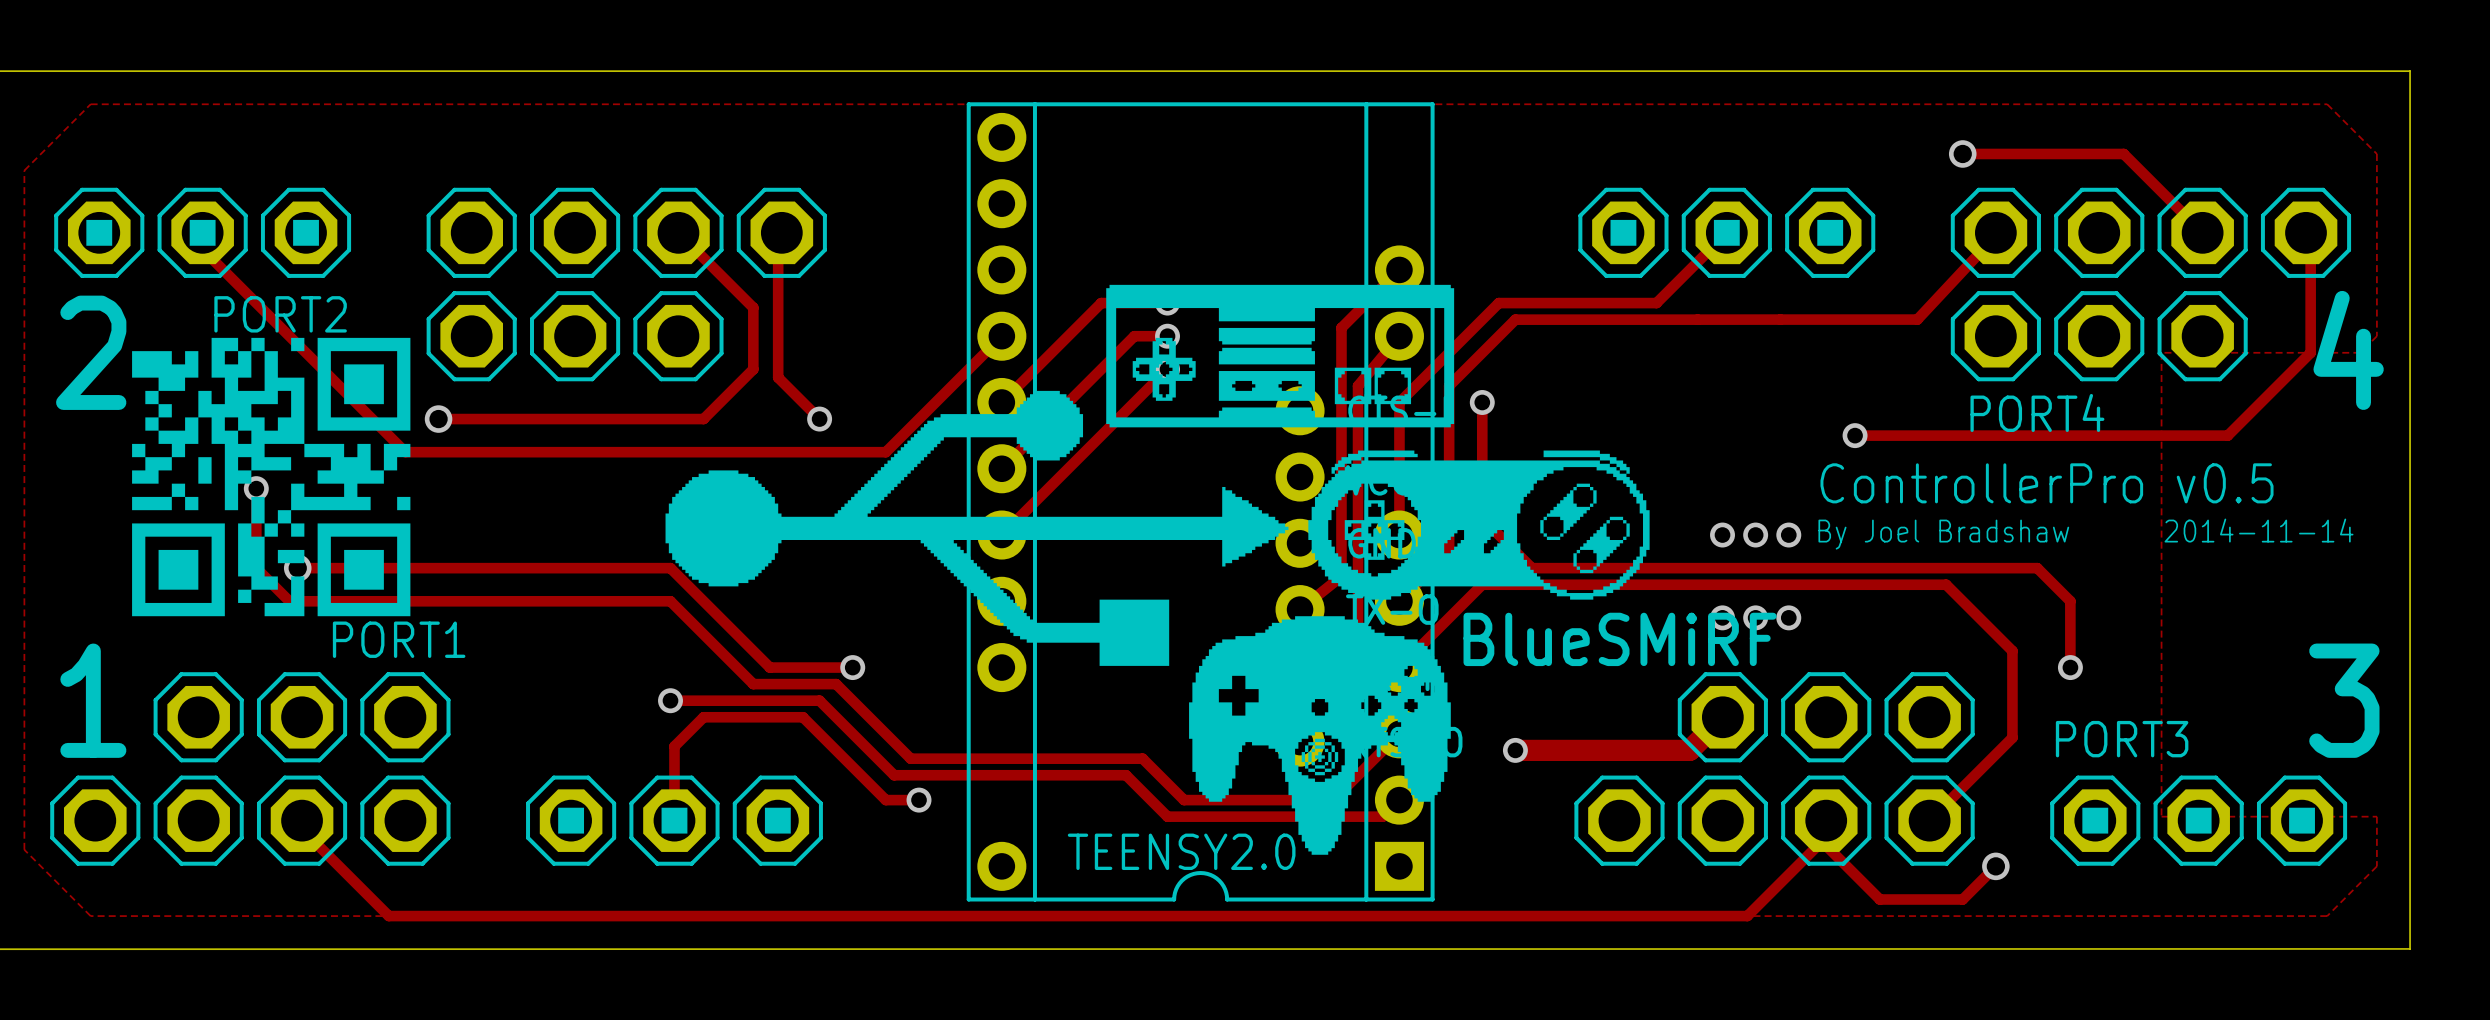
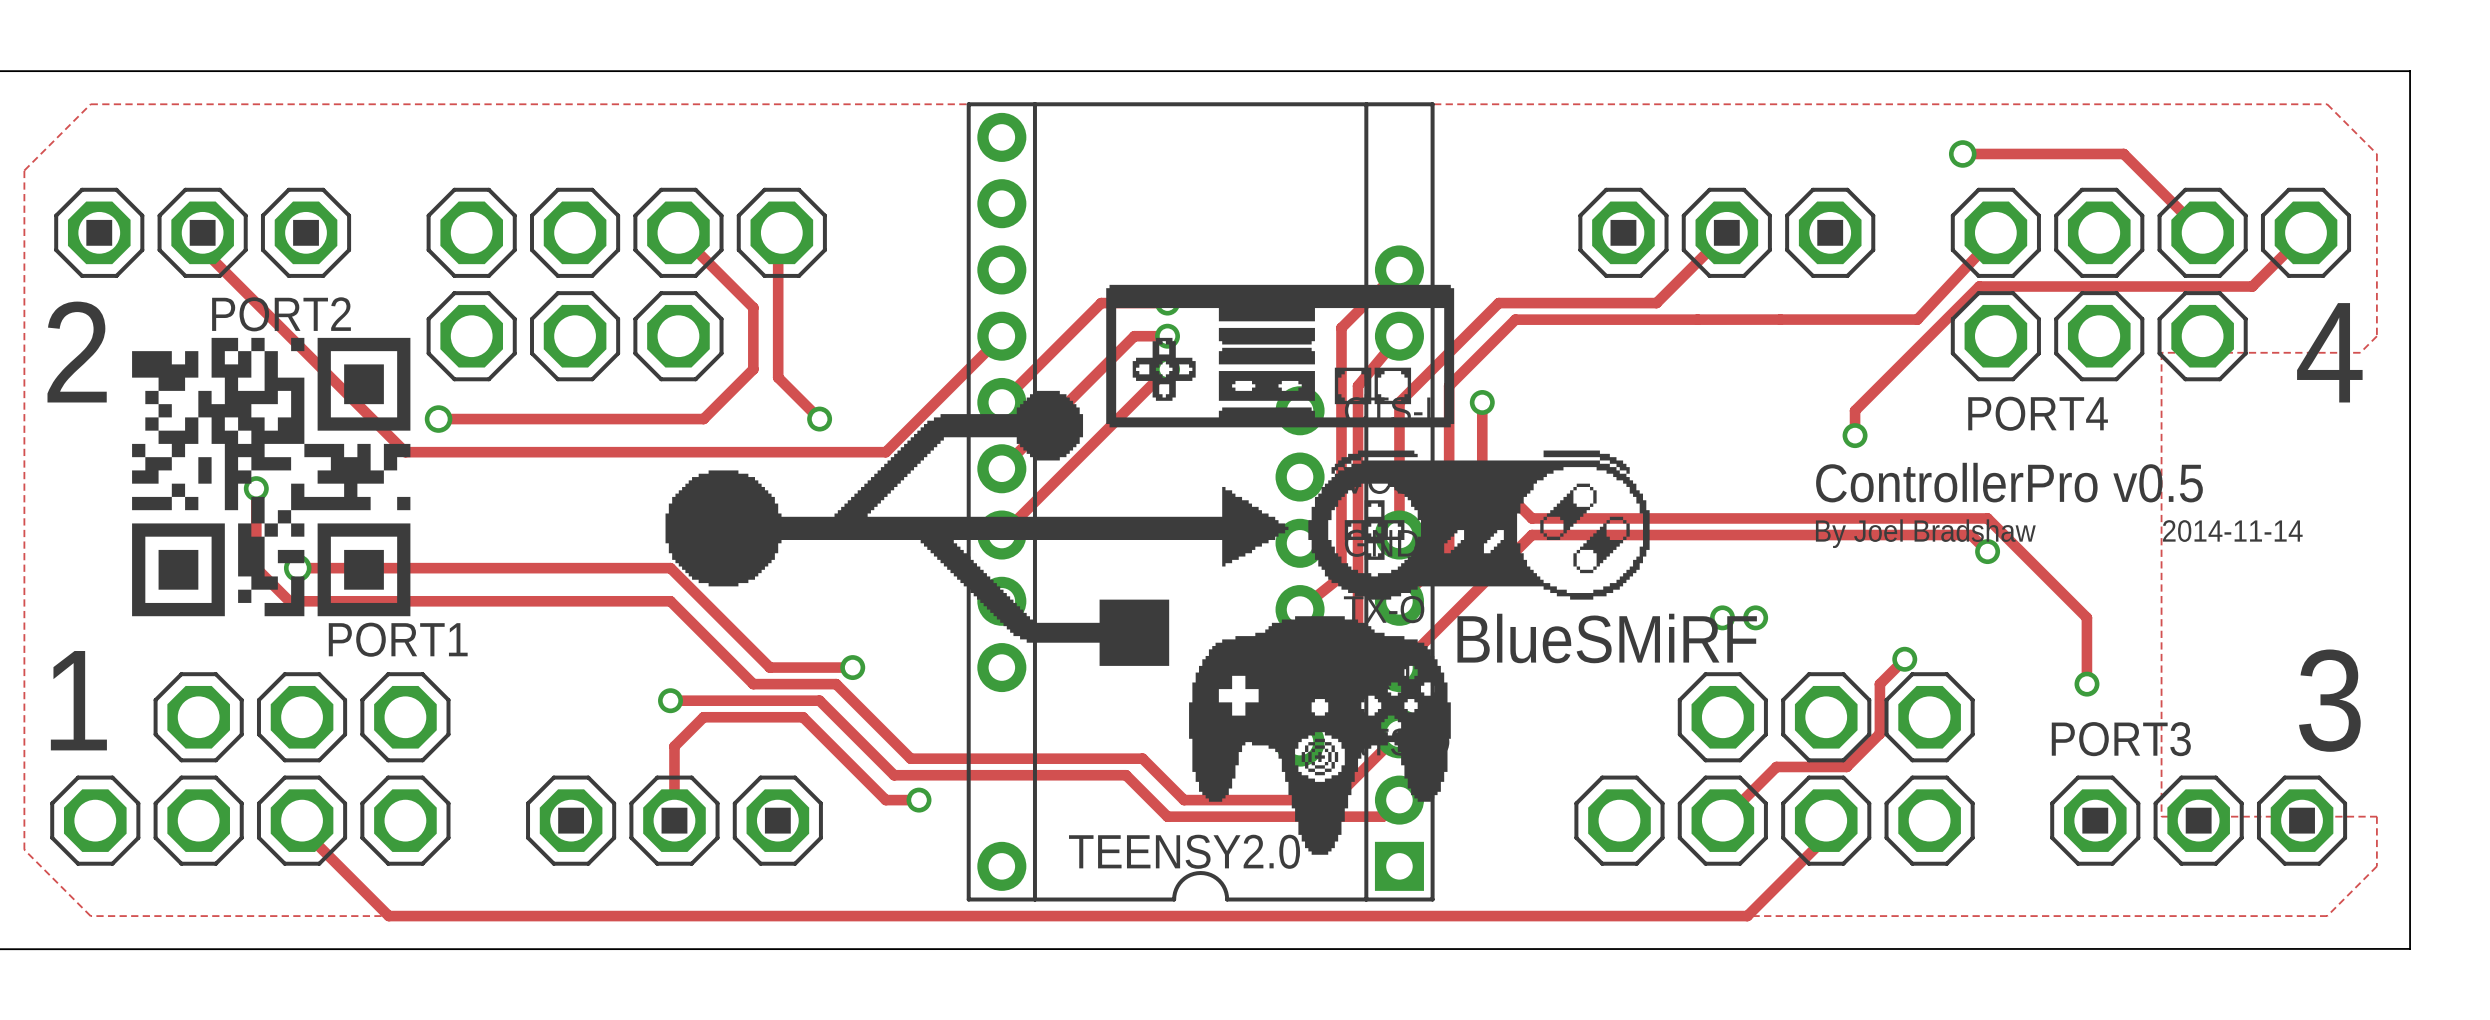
track: (2306, 232) (2310, 237) (2310, 352) (2227, 435) (1855, 435) -> (2306, 232) (2252, 286) (1979, 286) (1855, 410) (1855, 435)
track: (1482, 468) (1482, 518) (1531, 568) (2037, 568) -> (1482, 468) (1531, 518) (1987, 518) (2037, 568)
via: (1722, 535) -> none
via: (1755, 535) -> none
via: (1788, 535) -> none
via: none -> (1987, 551)
track: (1482, 584) (1946, 584) (2012, 650) (2012, 737) (1929, 820) -> (1482, 584) (1531, 535) (1971, 535) (1987, 551)
track: (2070, 601) (2070, 667) -> (2070, 601) (2086, 617) (2086, 684)
via: (1788, 617) -> none
track: none -> (1904, 659) (1879, 684) (1879, 733) (1846, 766) (1776, 766) (1722, 820)
via: none -> (1904, 659)
via position: (2070, 667) -> (2086, 684)
track: (1722, 717) (1689, 750) (1515, 750) -> none
via: (1515, 750) -> none
track: (1821, 841) (1879, 899) (1962, 899) (1995, 866) -> none
via: (1995, 866) -> none

